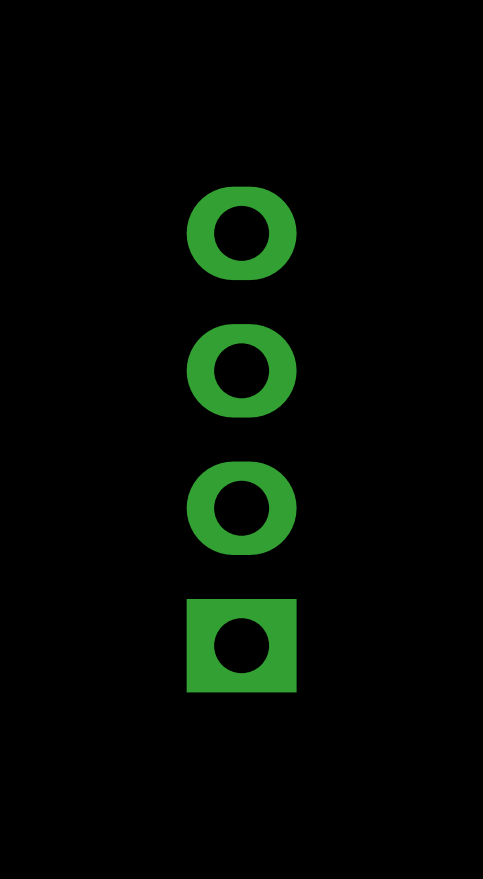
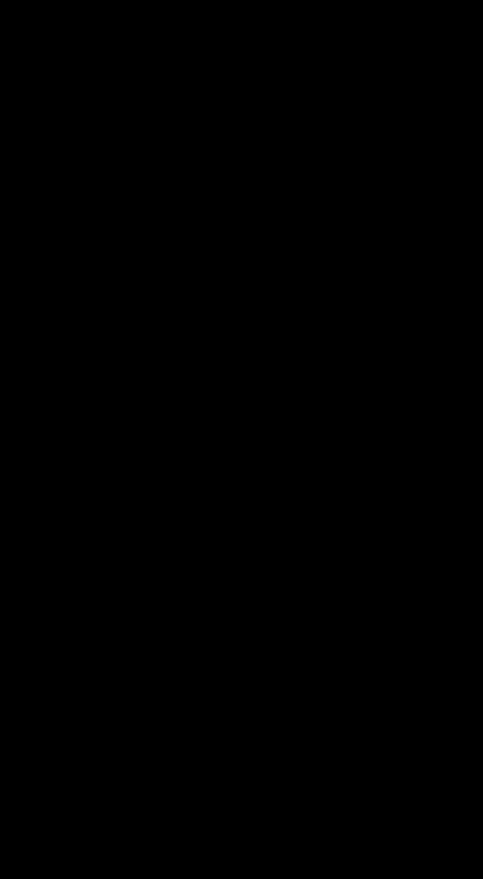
part: (241, 439) -> none

